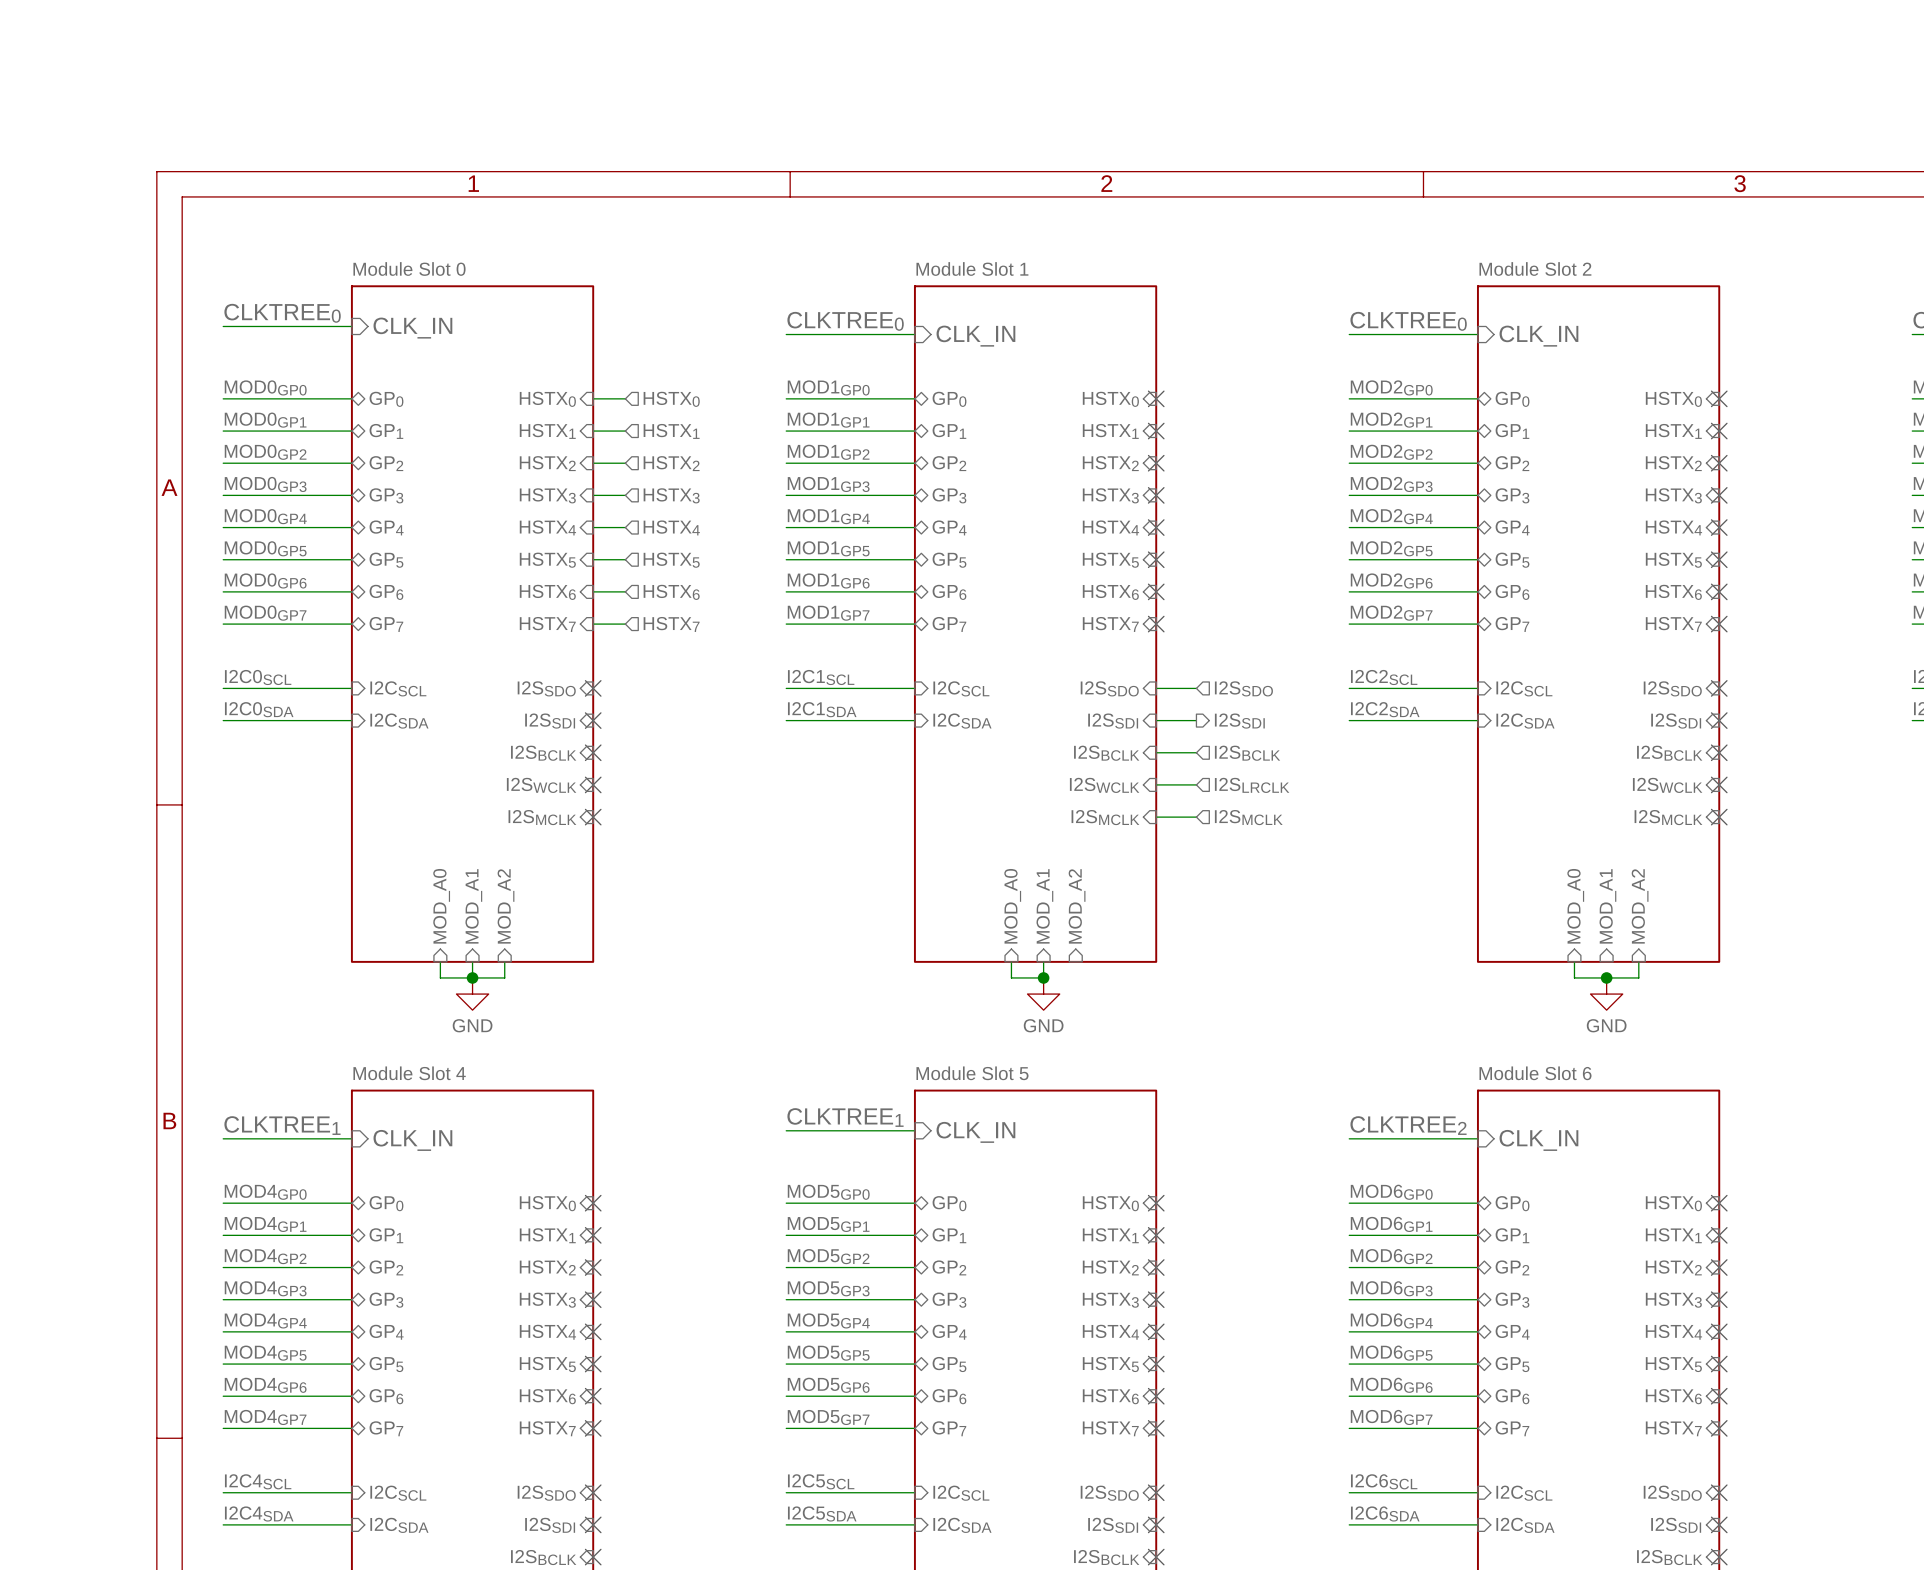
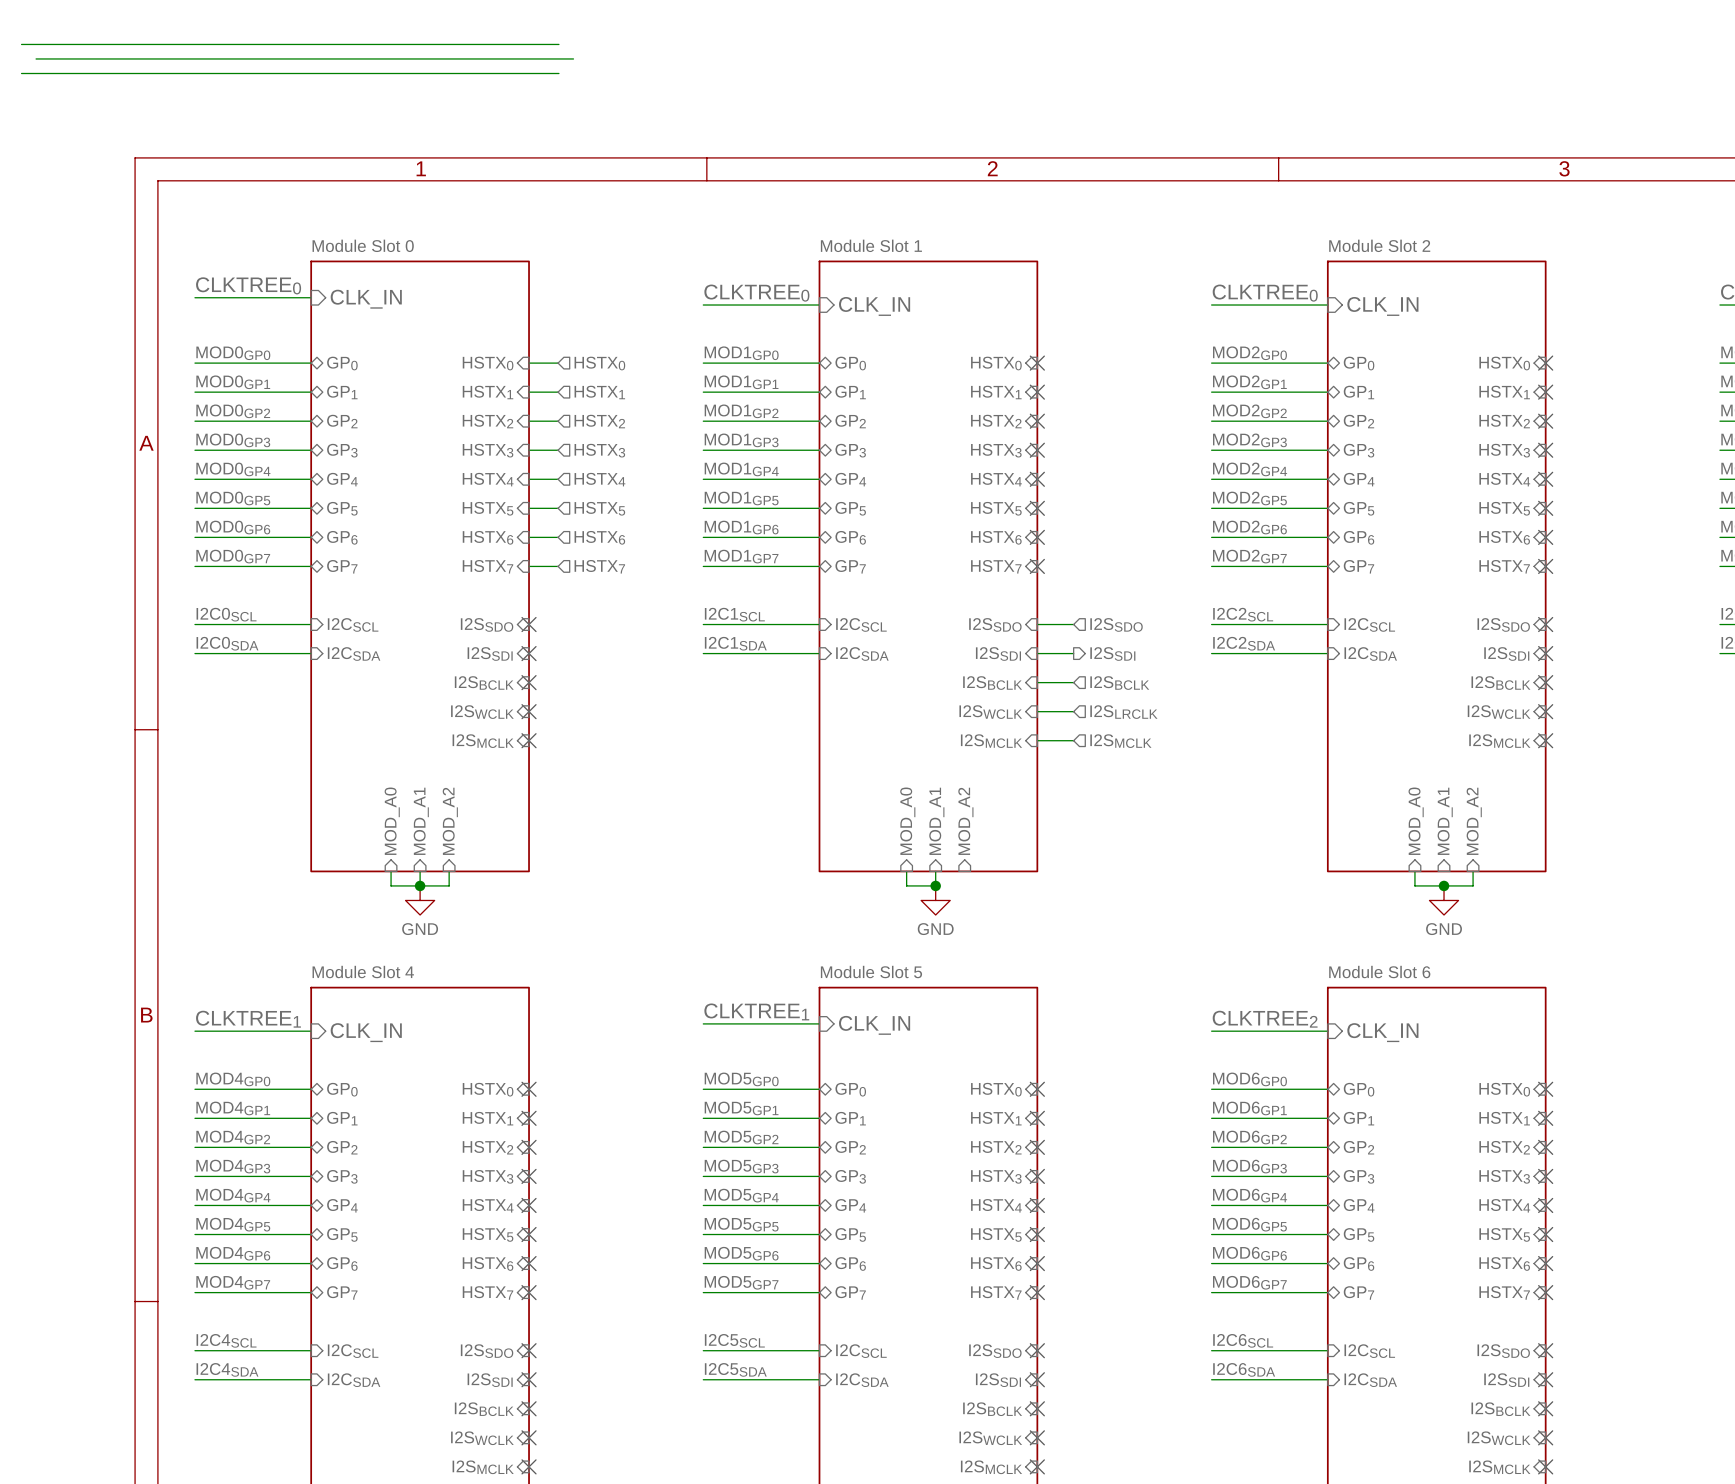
wire: none -> (21, 44) (558, 44)
wire: none -> (36, 58) (573, 58)
wire: none -> (21, 73) (558, 73)

